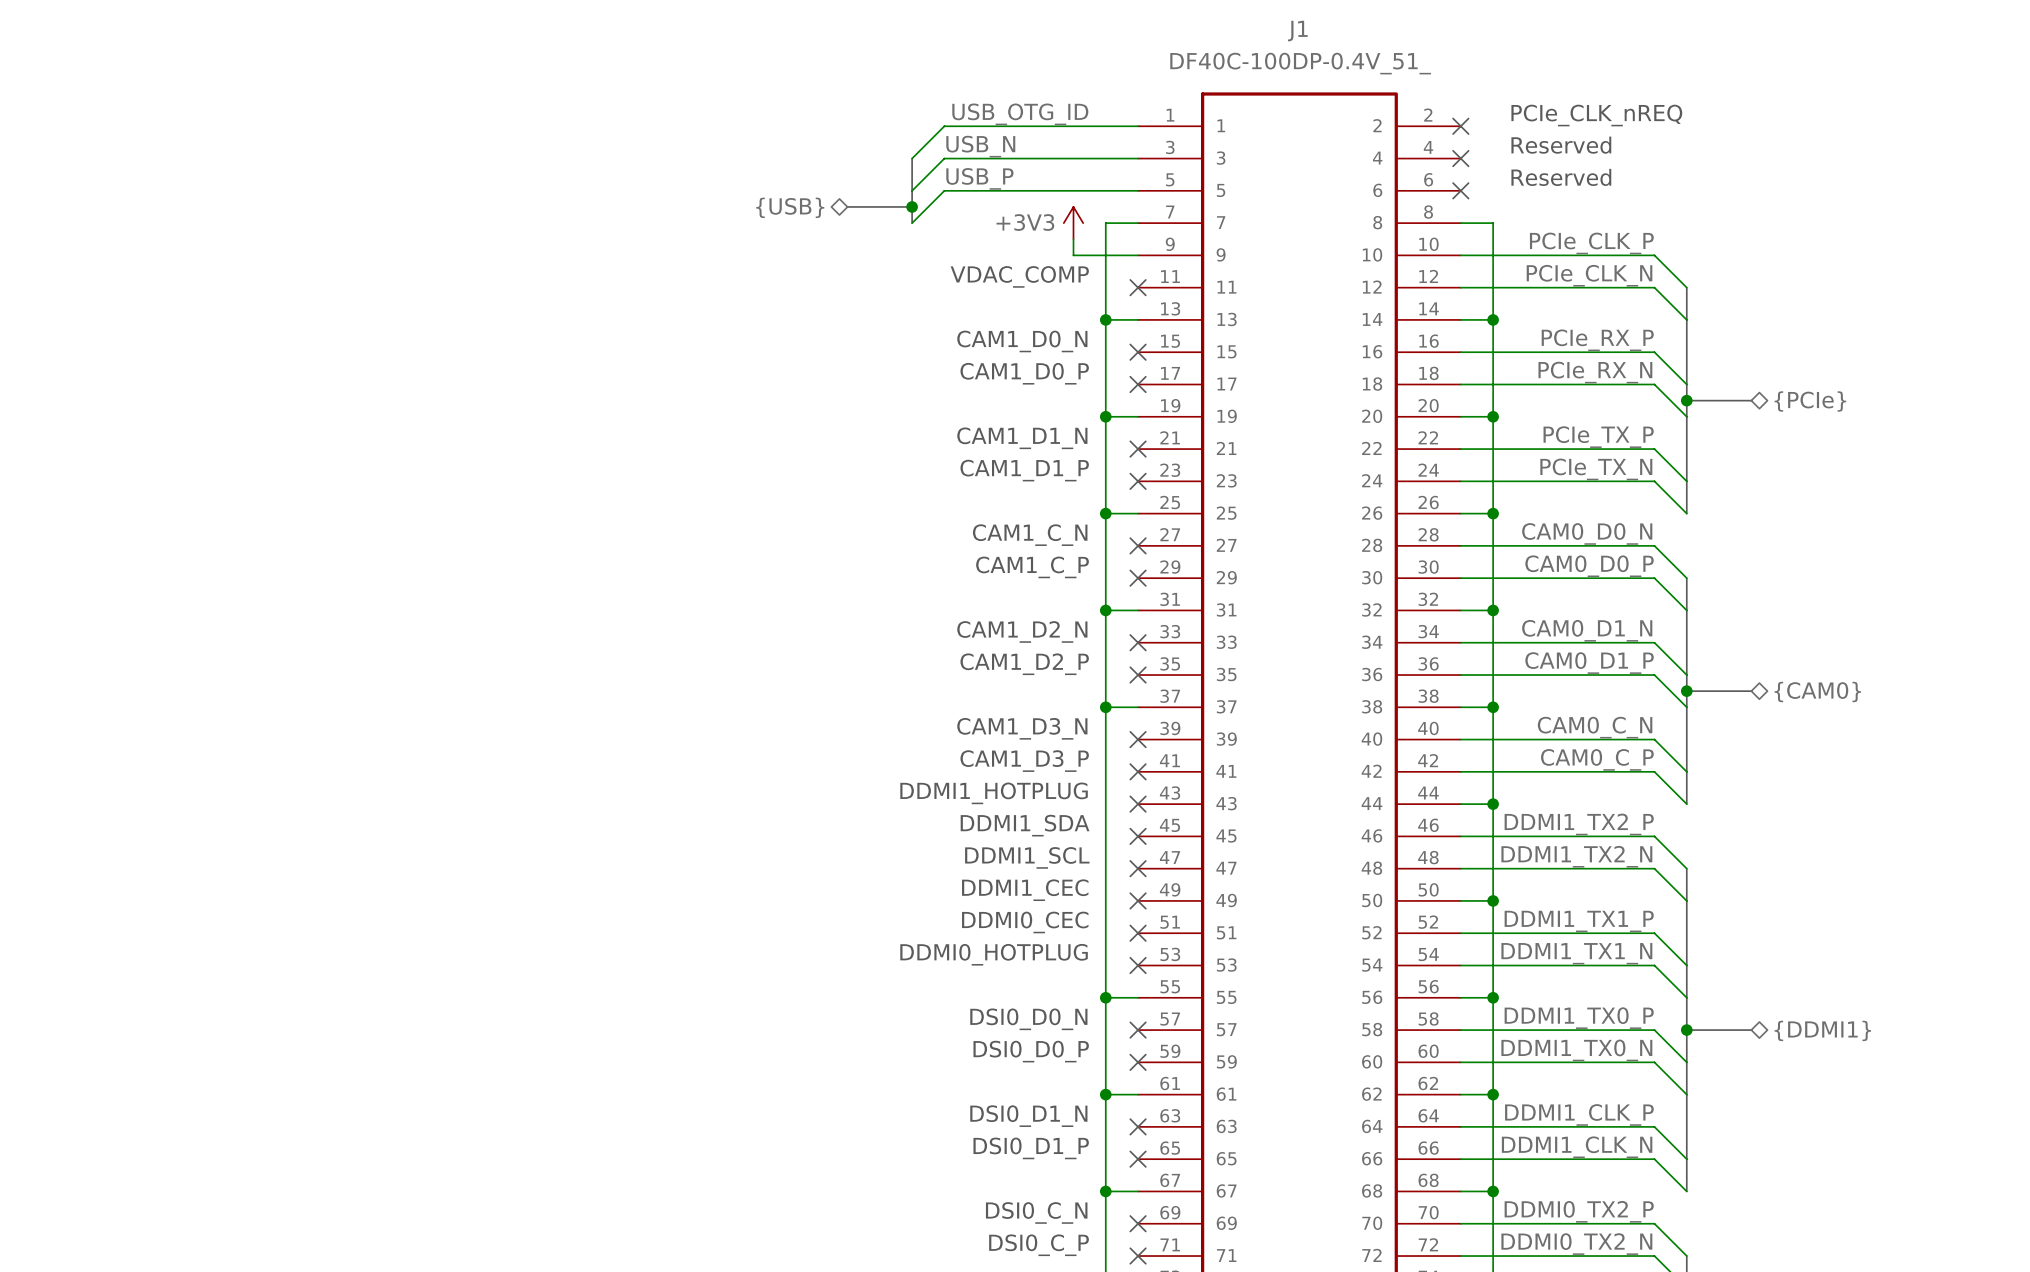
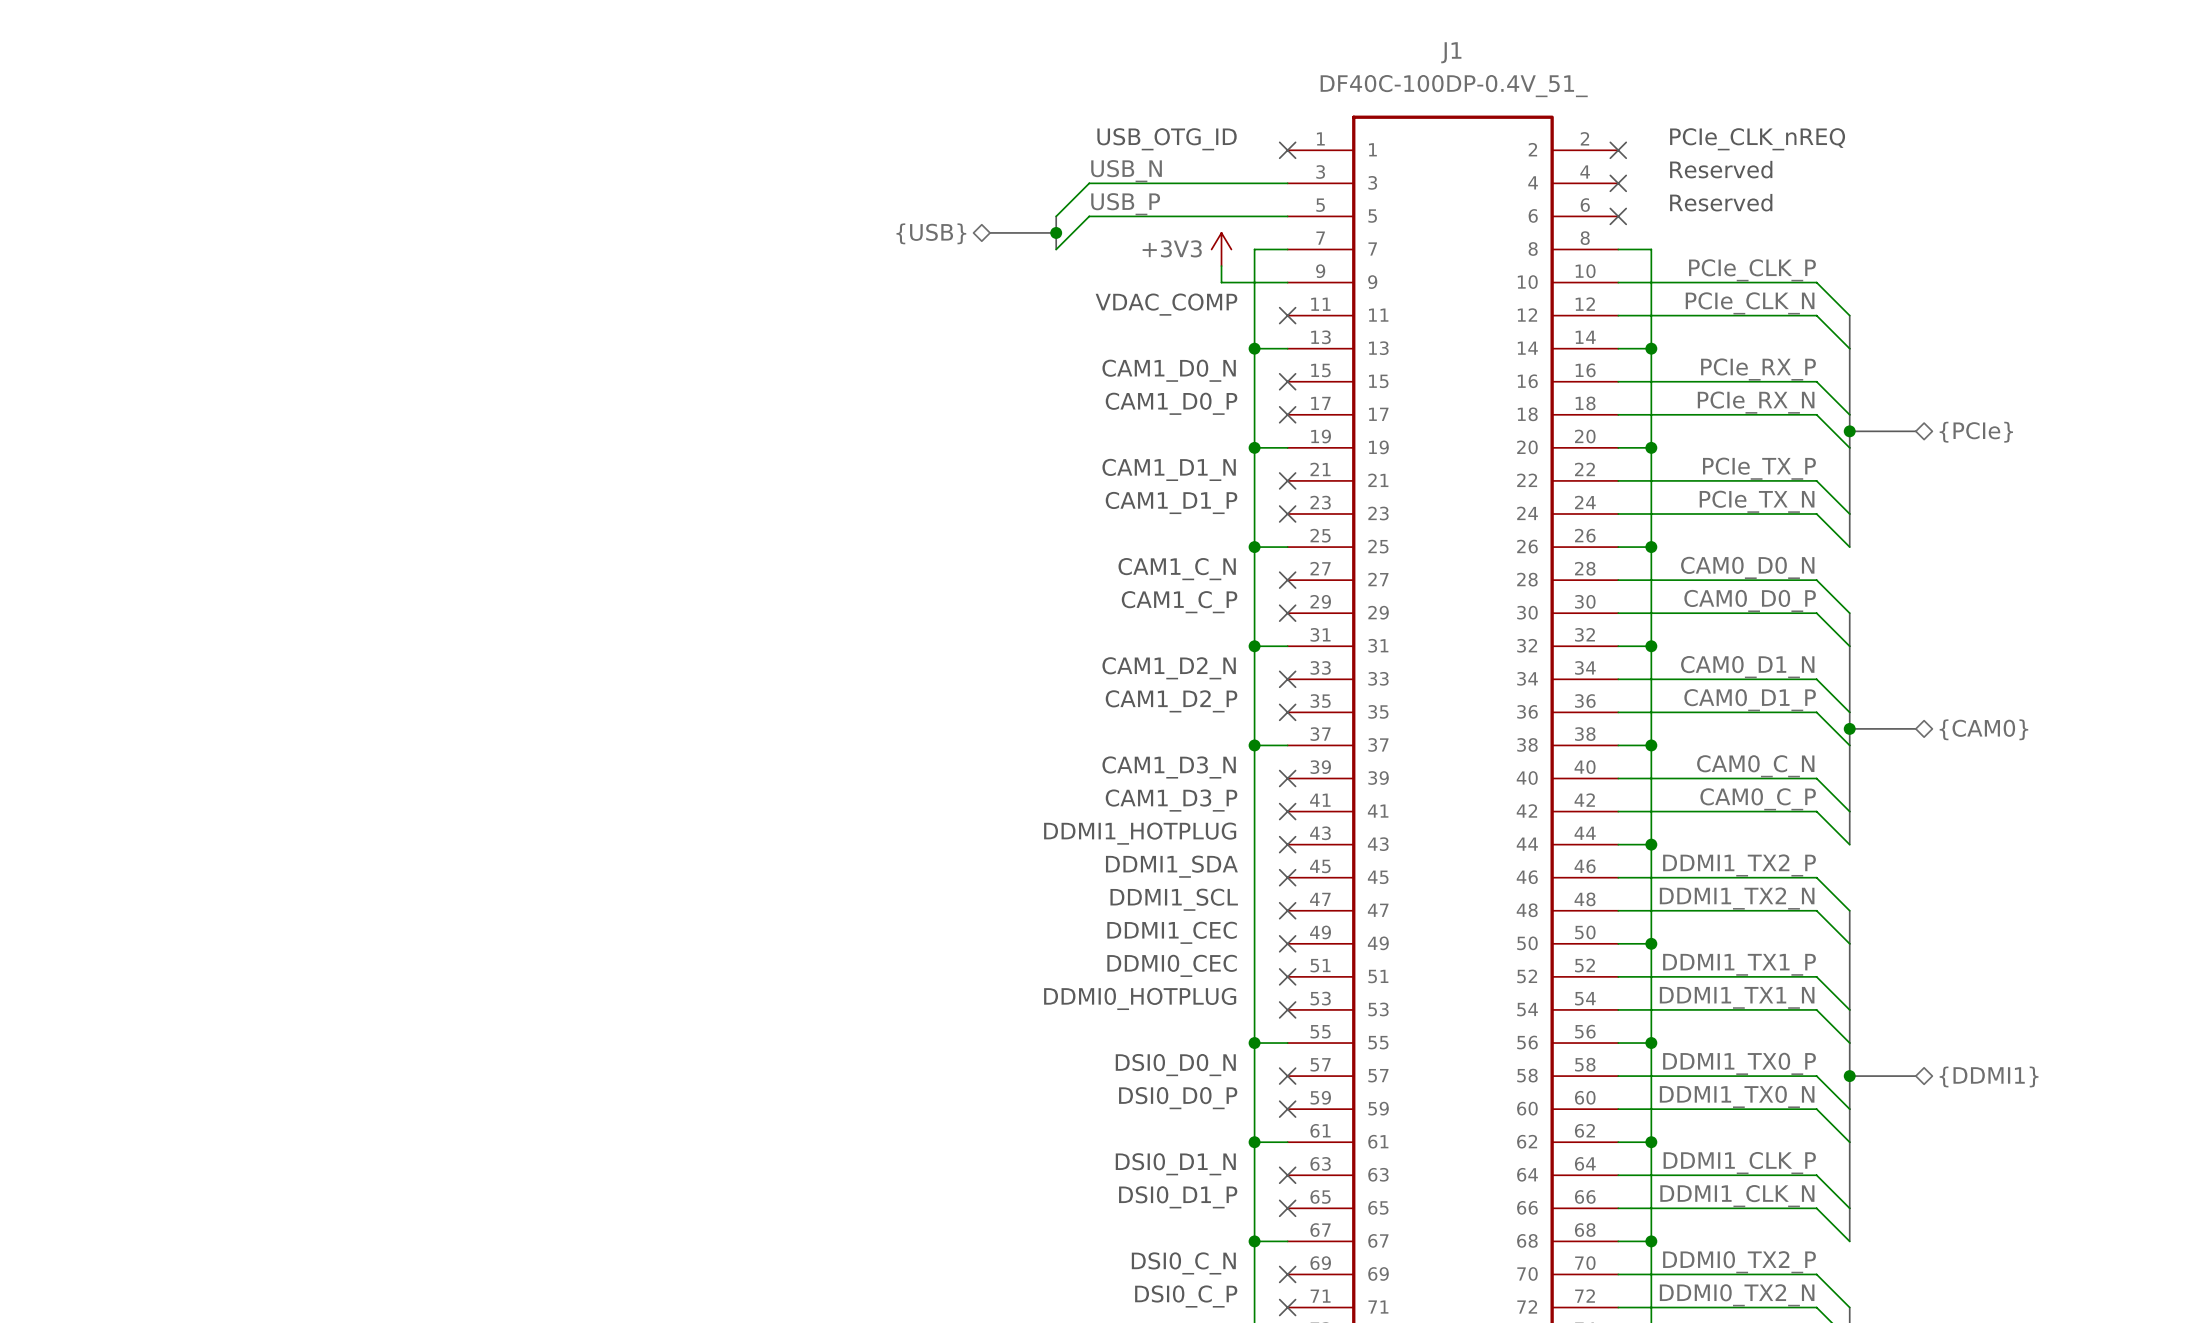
label: USB_OTG_ID (1020, 114) -> none
text: none -> USB_OTG_ID (1167, 139)
wire: (1138, 126) (944, 126) (912, 158) -> none
no-connect mark: none -> (1287, 150)
bus: (912, 158) (912, 190) -> none

